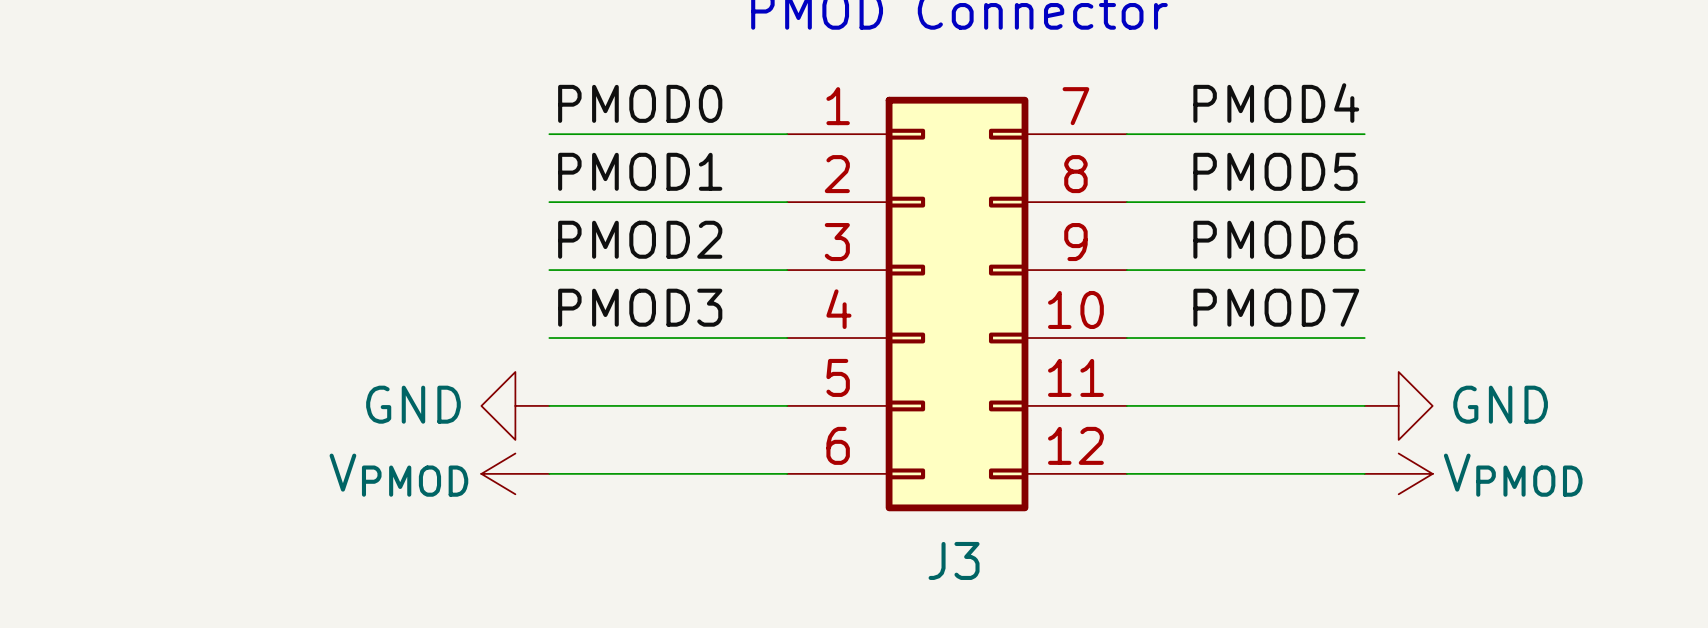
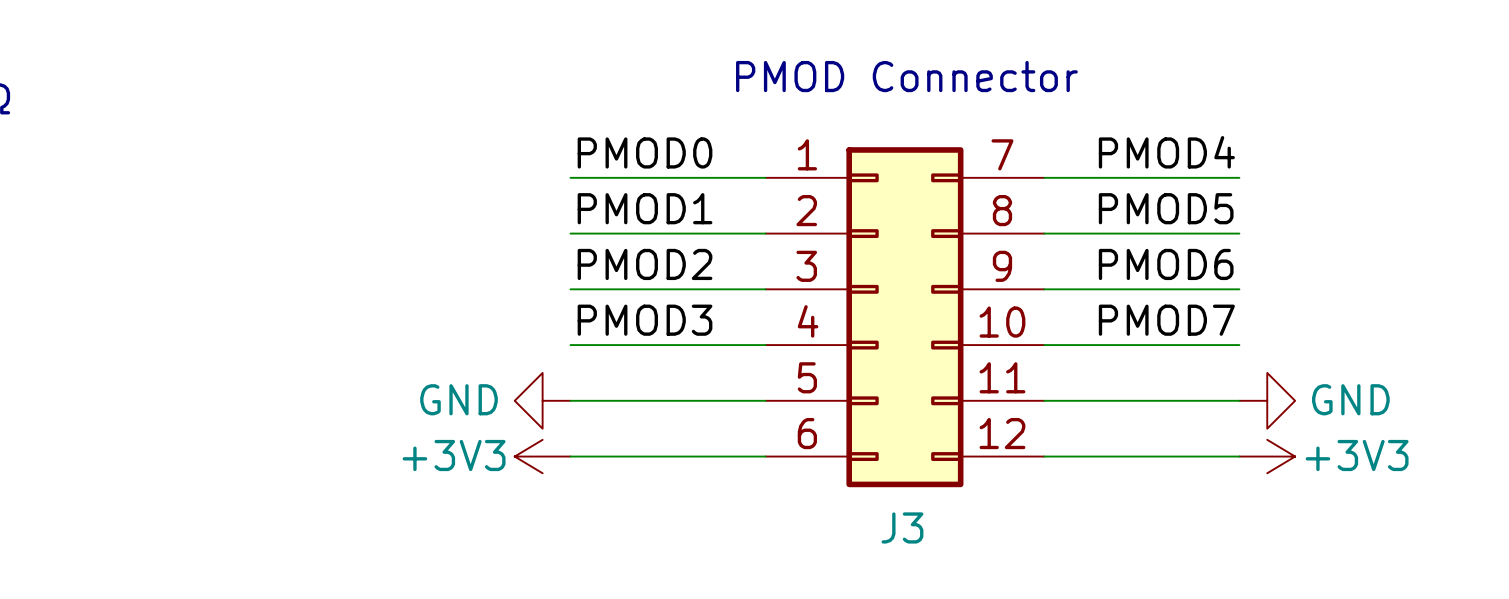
power symbol: VPMOD (515, 473) -> +3V3 (542, 456)
power symbol: VPMOD (1398, 473) -> +3V3 (1267, 456)

